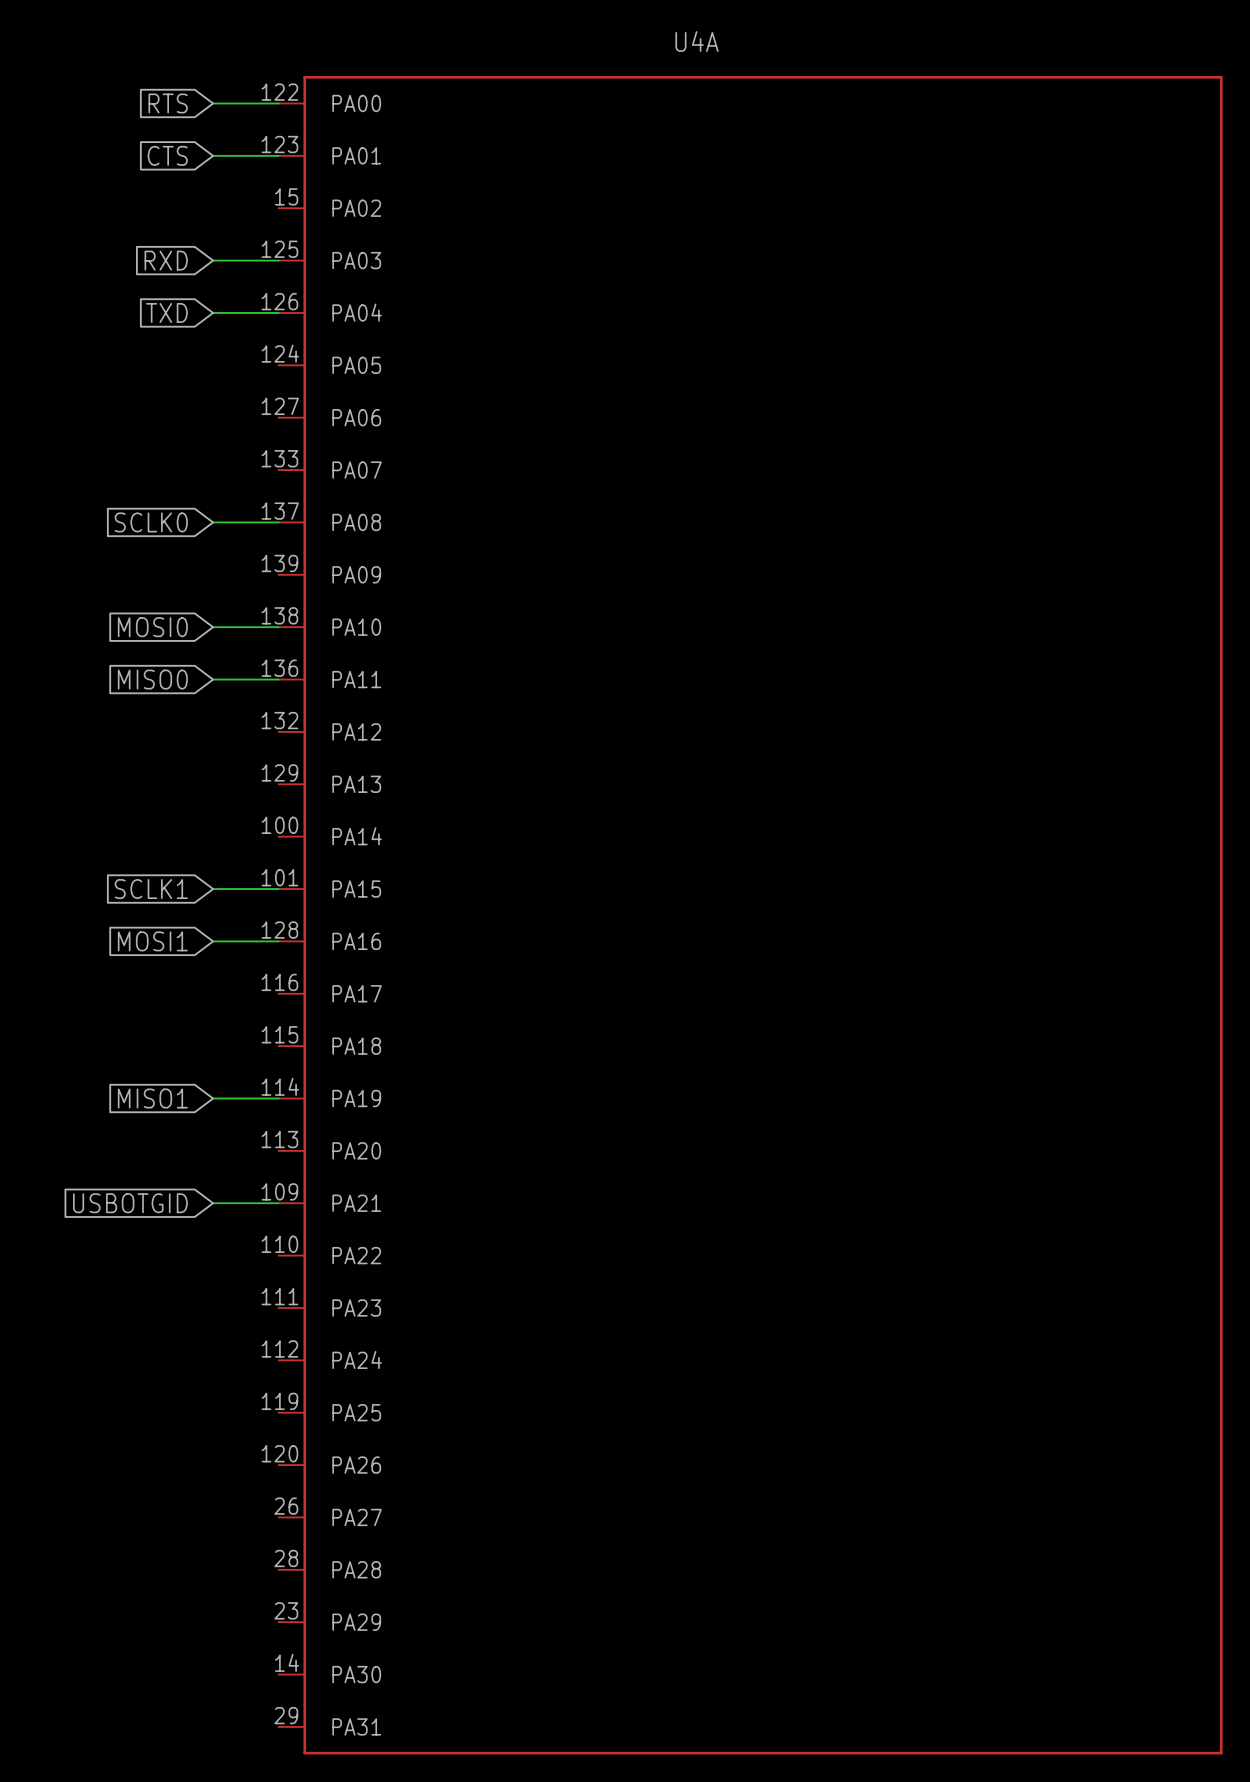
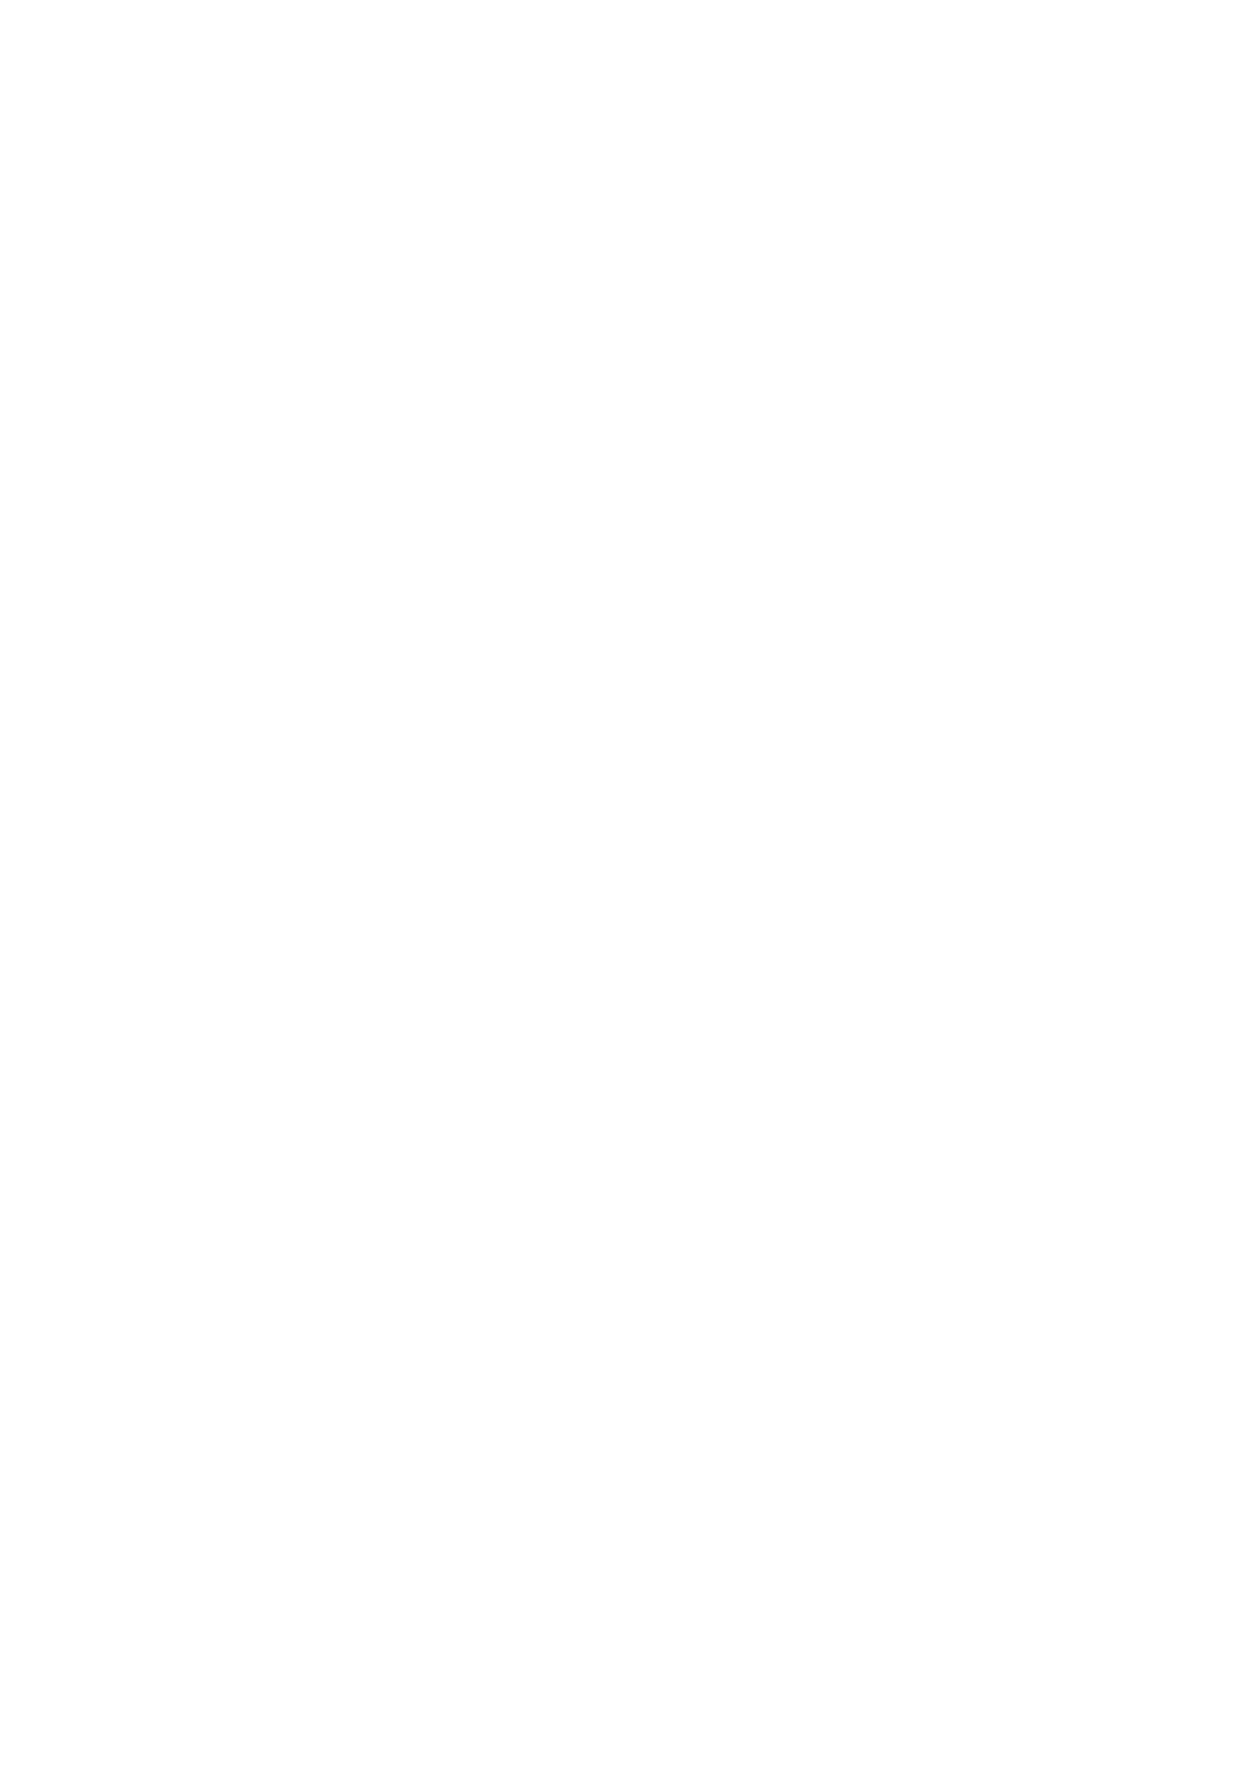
global label: RTS (168, 103) -> none
wire: (213, 103) (278, 103) -> none
global label: CTS (167, 155) -> none
wire: (213, 155) (278, 155) -> none
global label: RXD (166, 260) -> none
wire: (213, 260) (278, 260) -> none
global label: TXD (166, 312) -> none
wire: (213, 312) (278, 312) -> none
global label: SCLK0 (151, 522) -> none
wire: (213, 522) (278, 522) -> none
global label: MOSI0 (152, 627) -> none
wire: (213, 627) (278, 627) -> none
global label: MISO0 (152, 679) -> none
wire: (213, 679) (278, 679) -> none
global label: SCLK1 (151, 889) -> none
wire: (213, 889) (278, 889) -> none
U4A: (750, 915) -> none
global label: MOSI1 (152, 941) -> none
wire: (213, 941) (278, 941) -> none
global label: MISO1 (152, 1098) -> none
wire: (213, 1098) (278, 1098) -> none
global label: USBOTGID (130, 1203) -> none
wire: (213, 1203) (278, 1203) -> none

